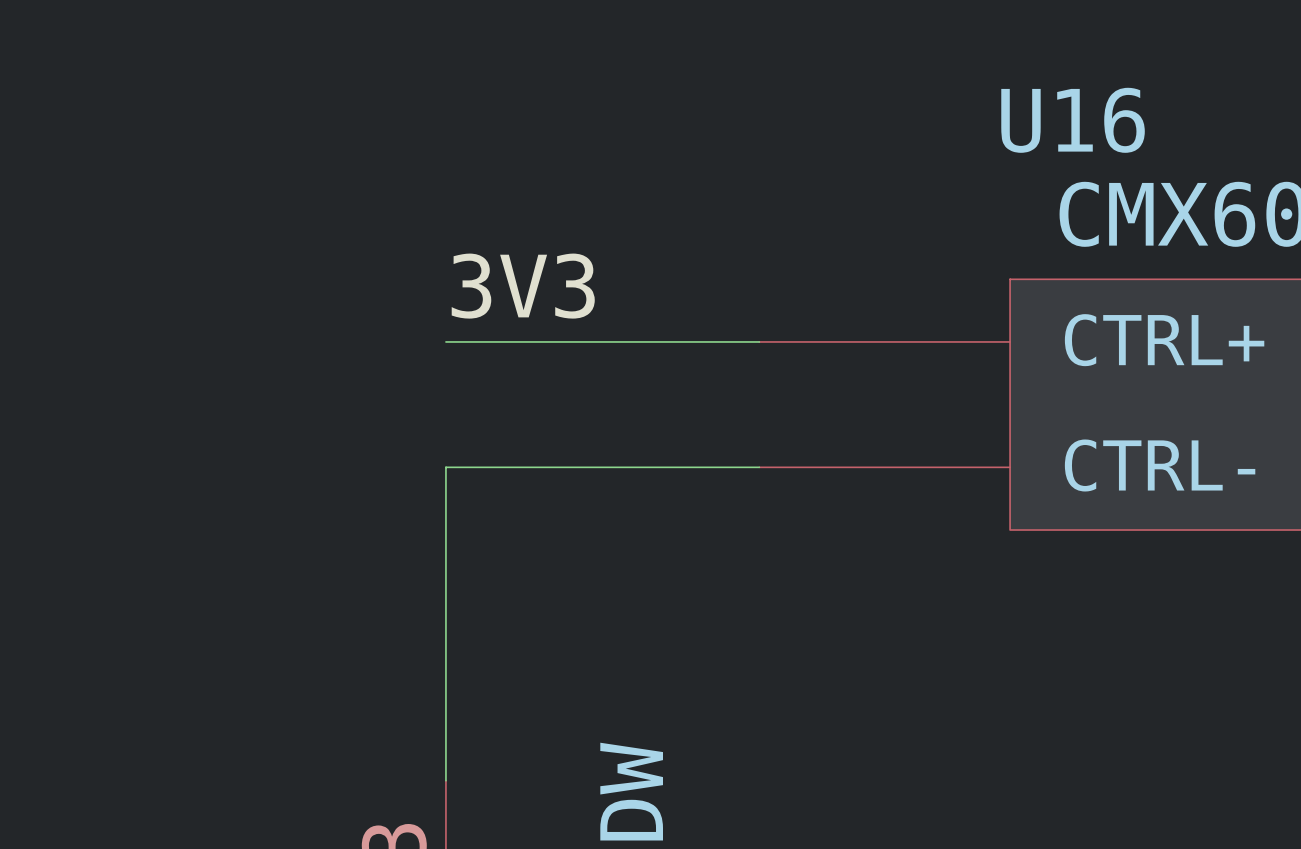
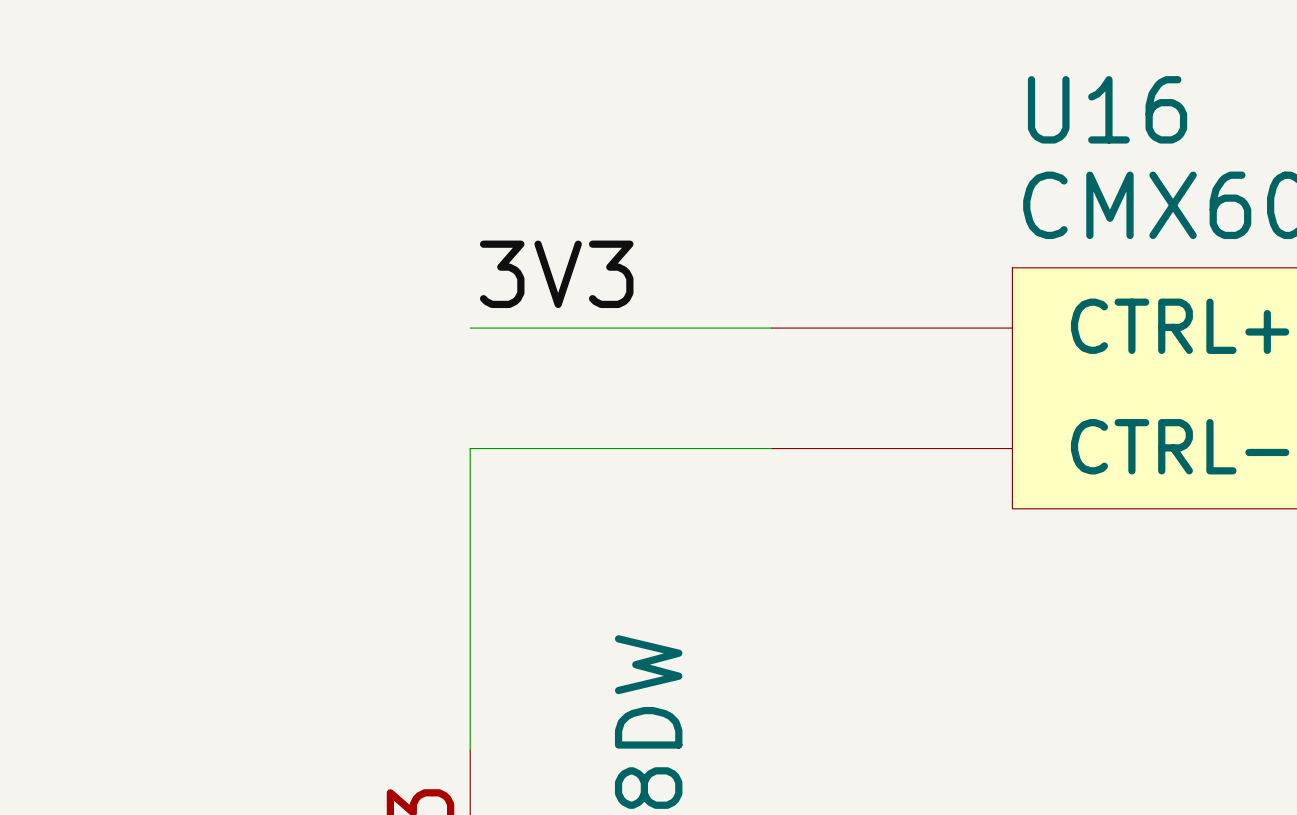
U16 name position: U16 (1073, 120) -> U16 (1107, 109)

